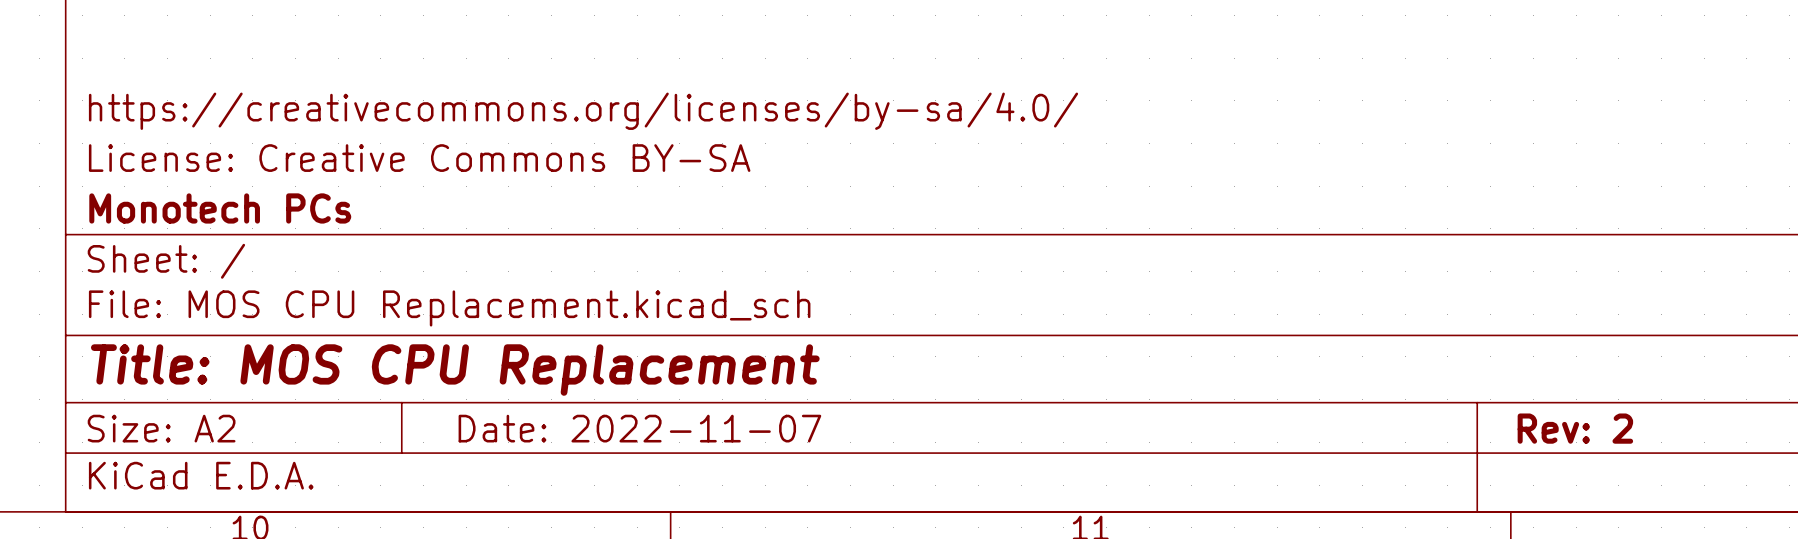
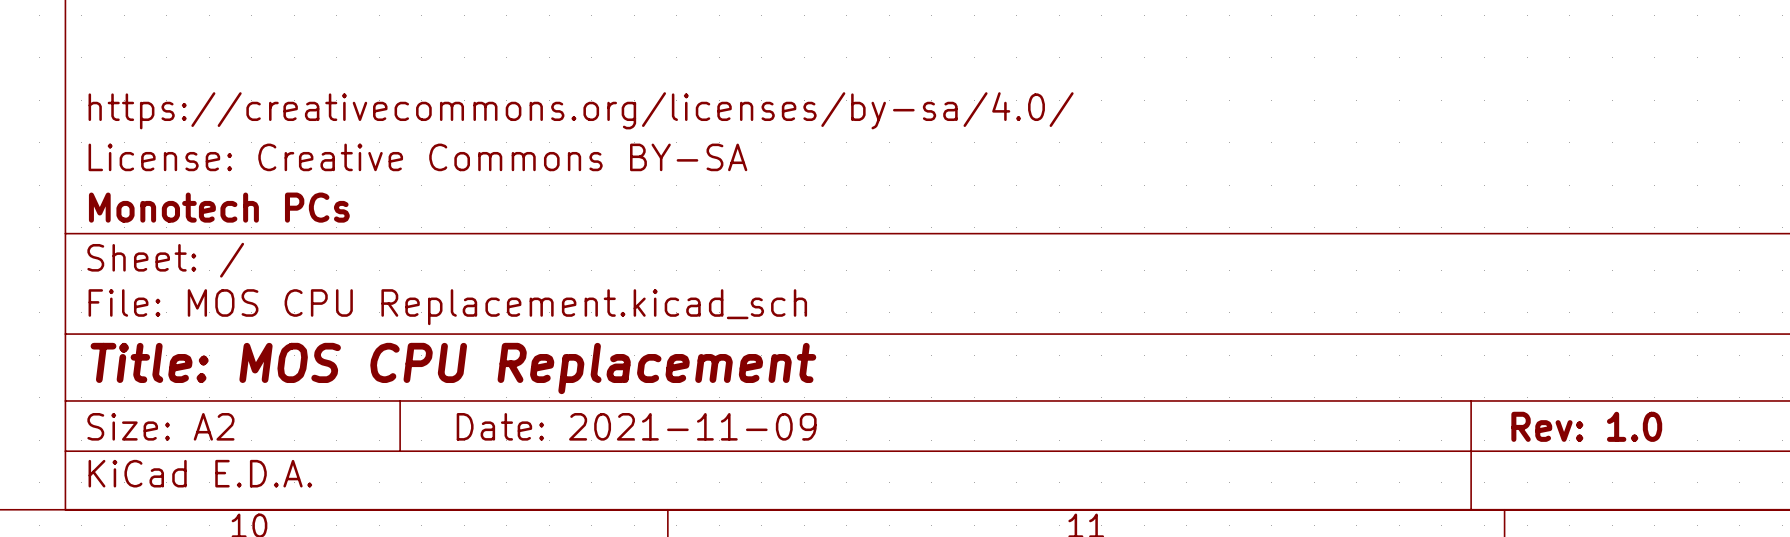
title block: Date: 2022-11-07 (639, 428) -> Date: 2021-11-09 (636, 426)
title block: Rev: 2 (1575, 428) -> Rev: 1.0 (1586, 426)

